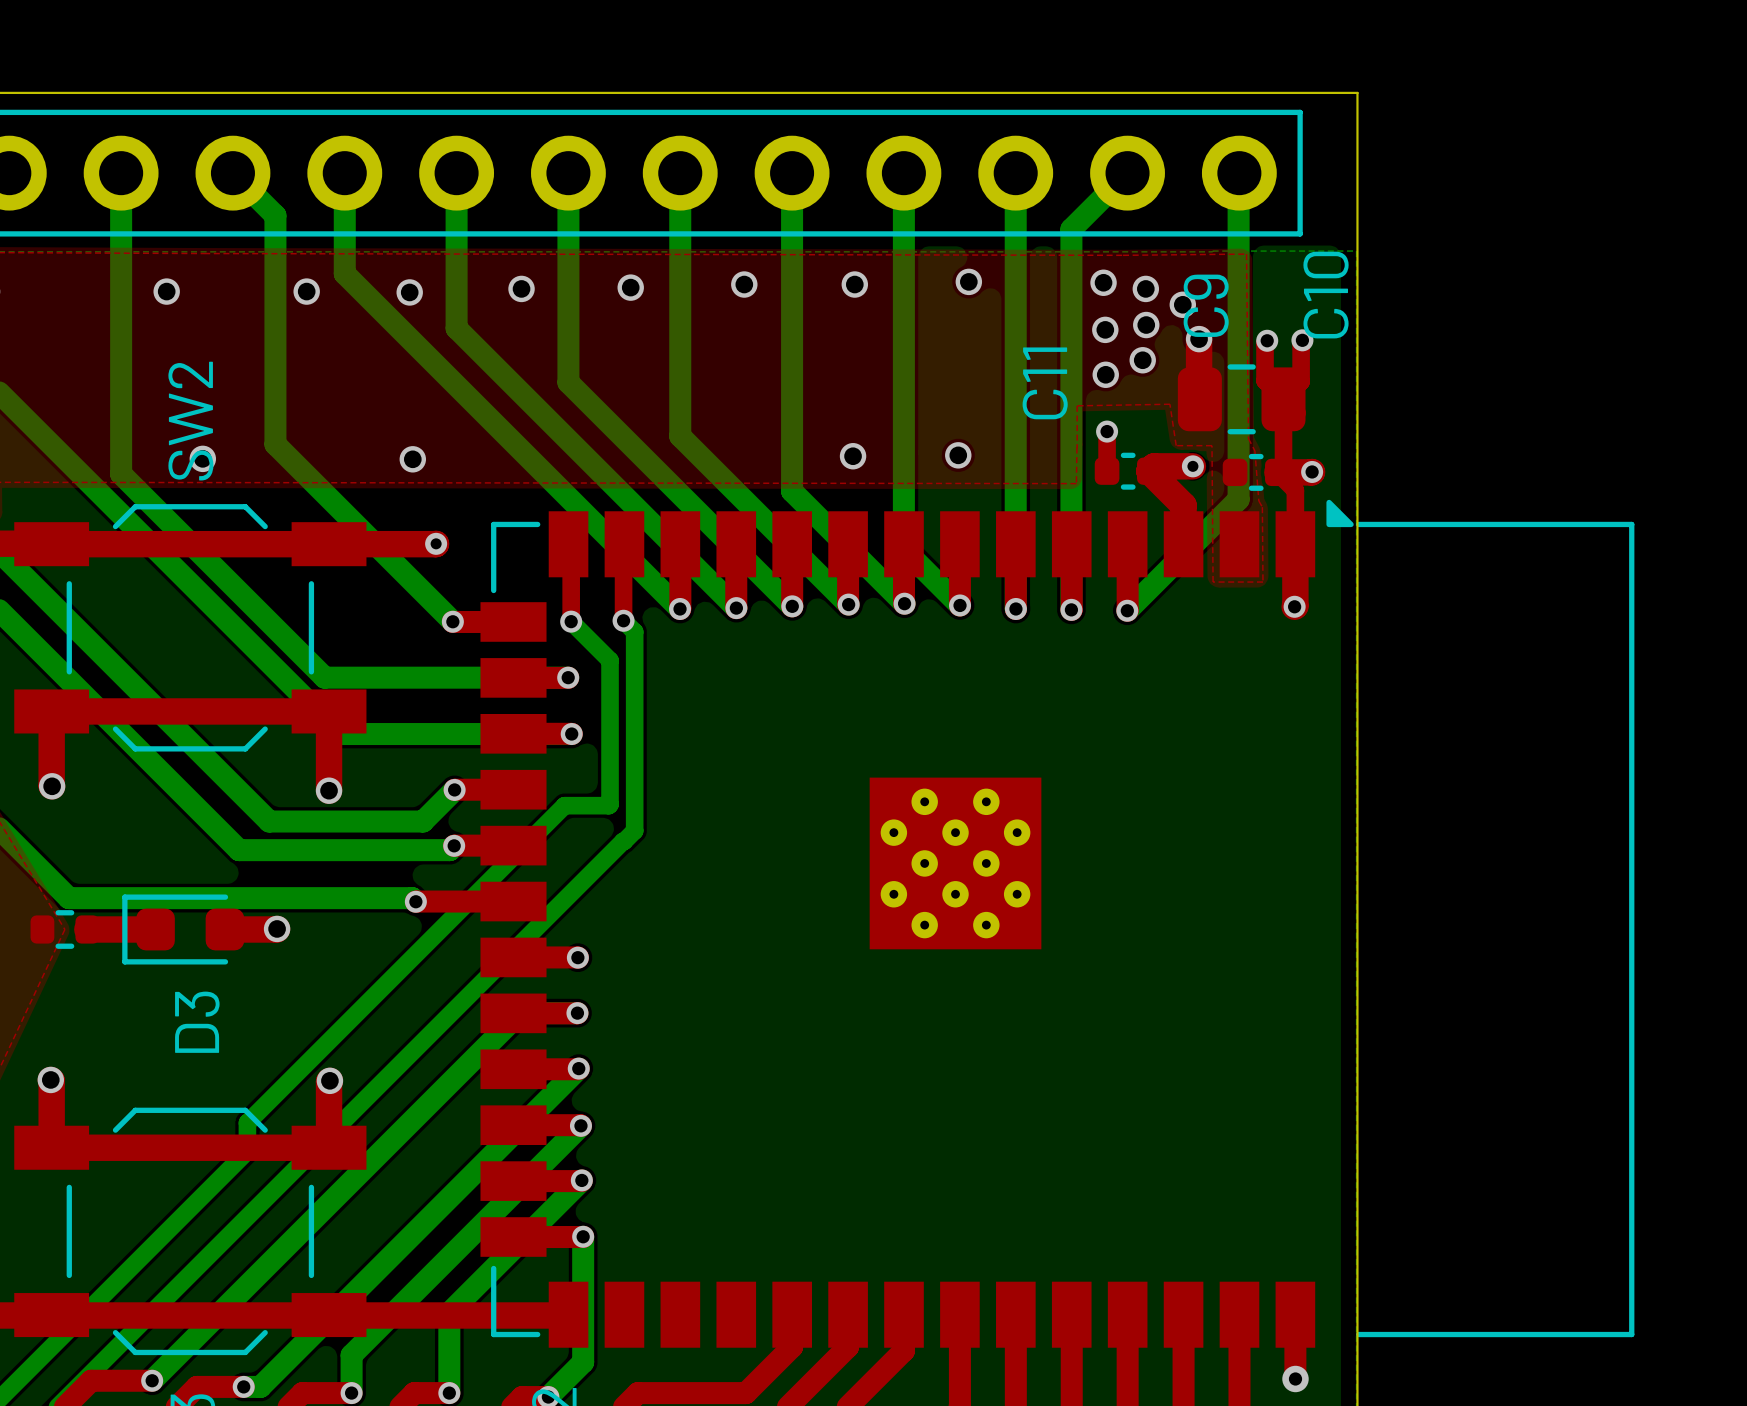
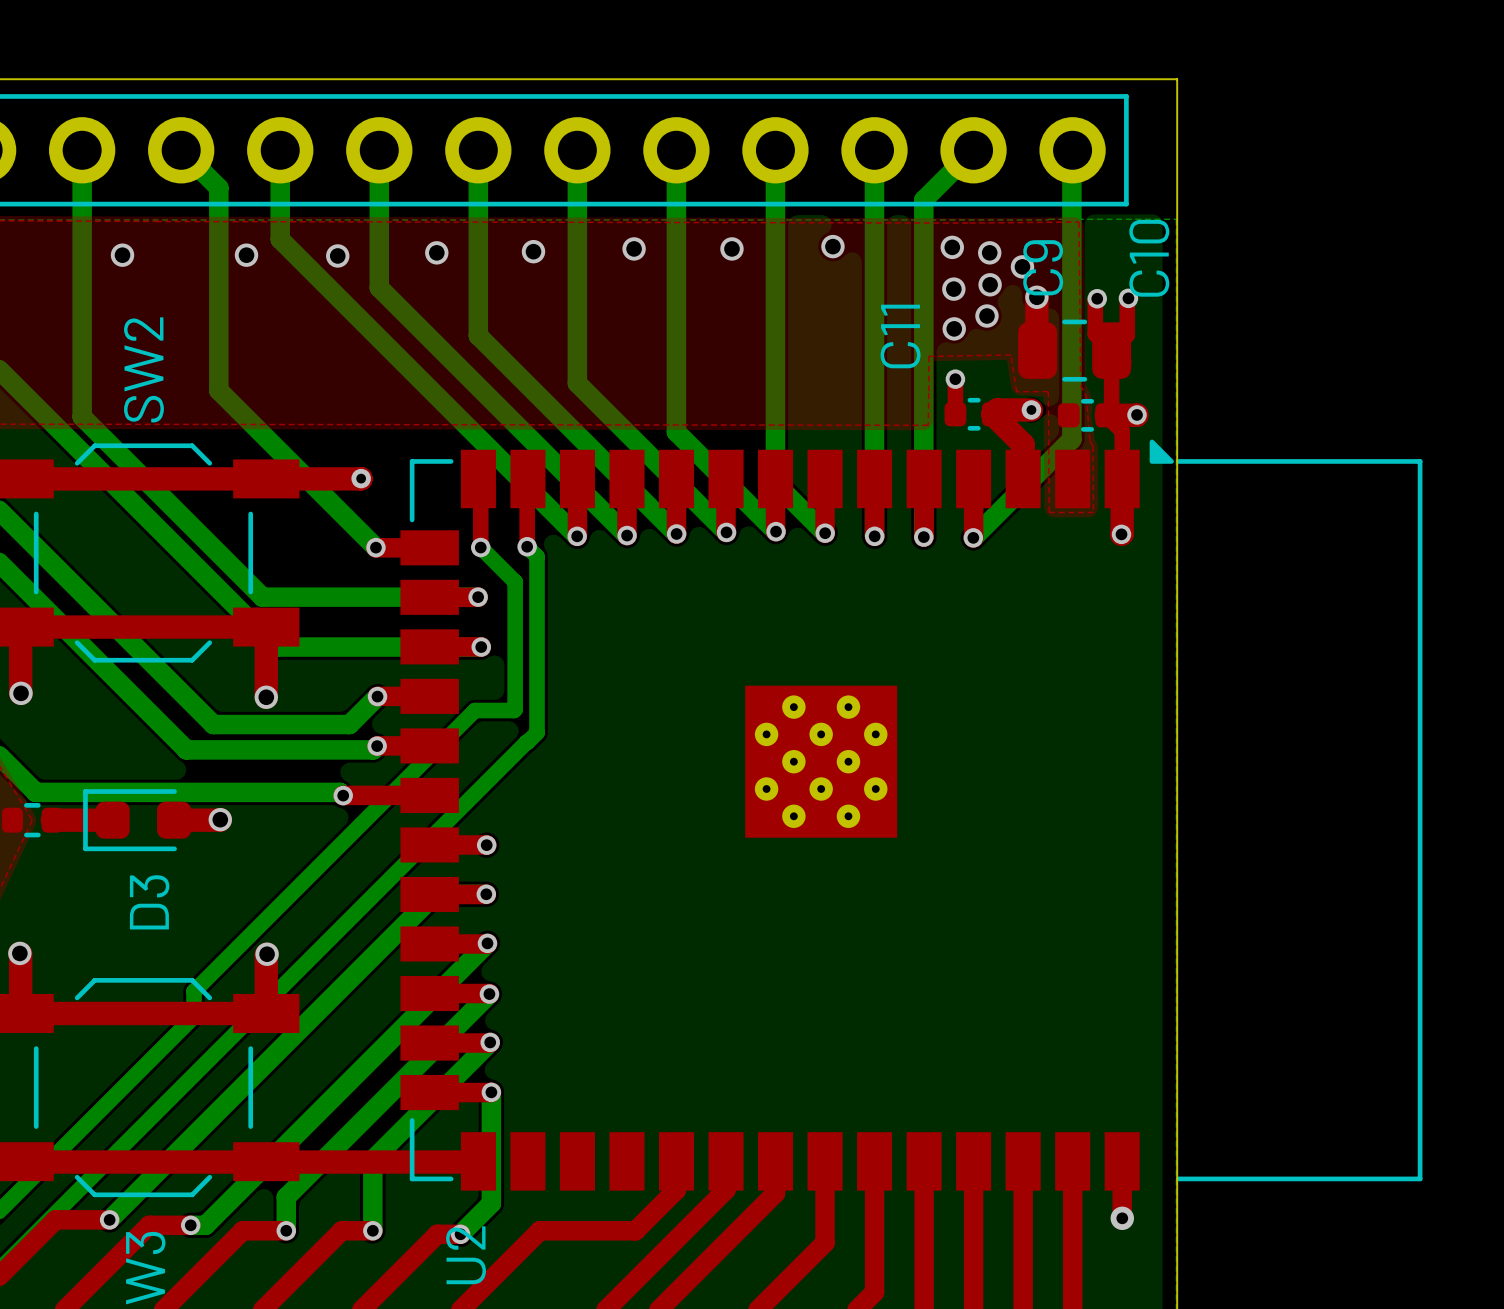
via: (958, 455) -> none
via: (853, 456) -> none
via: (202, 458) -> none
via: (412, 459) -> none

